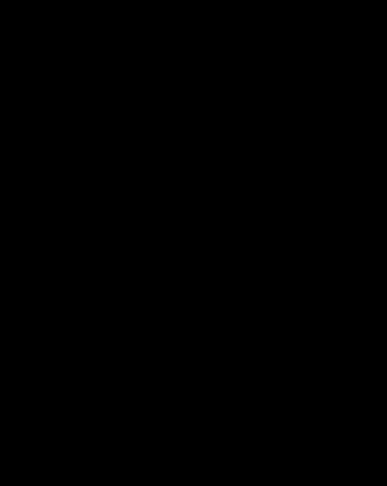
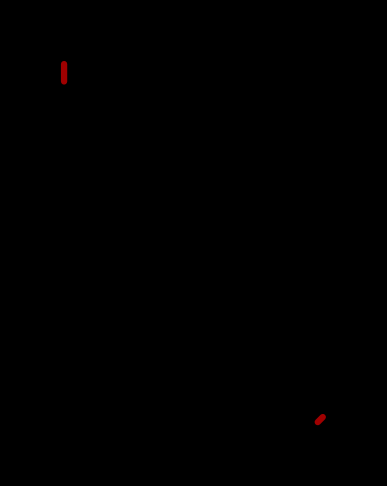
track: none -> (64, 64) (64, 81)
track: none -> (322, 417) (317, 422)

